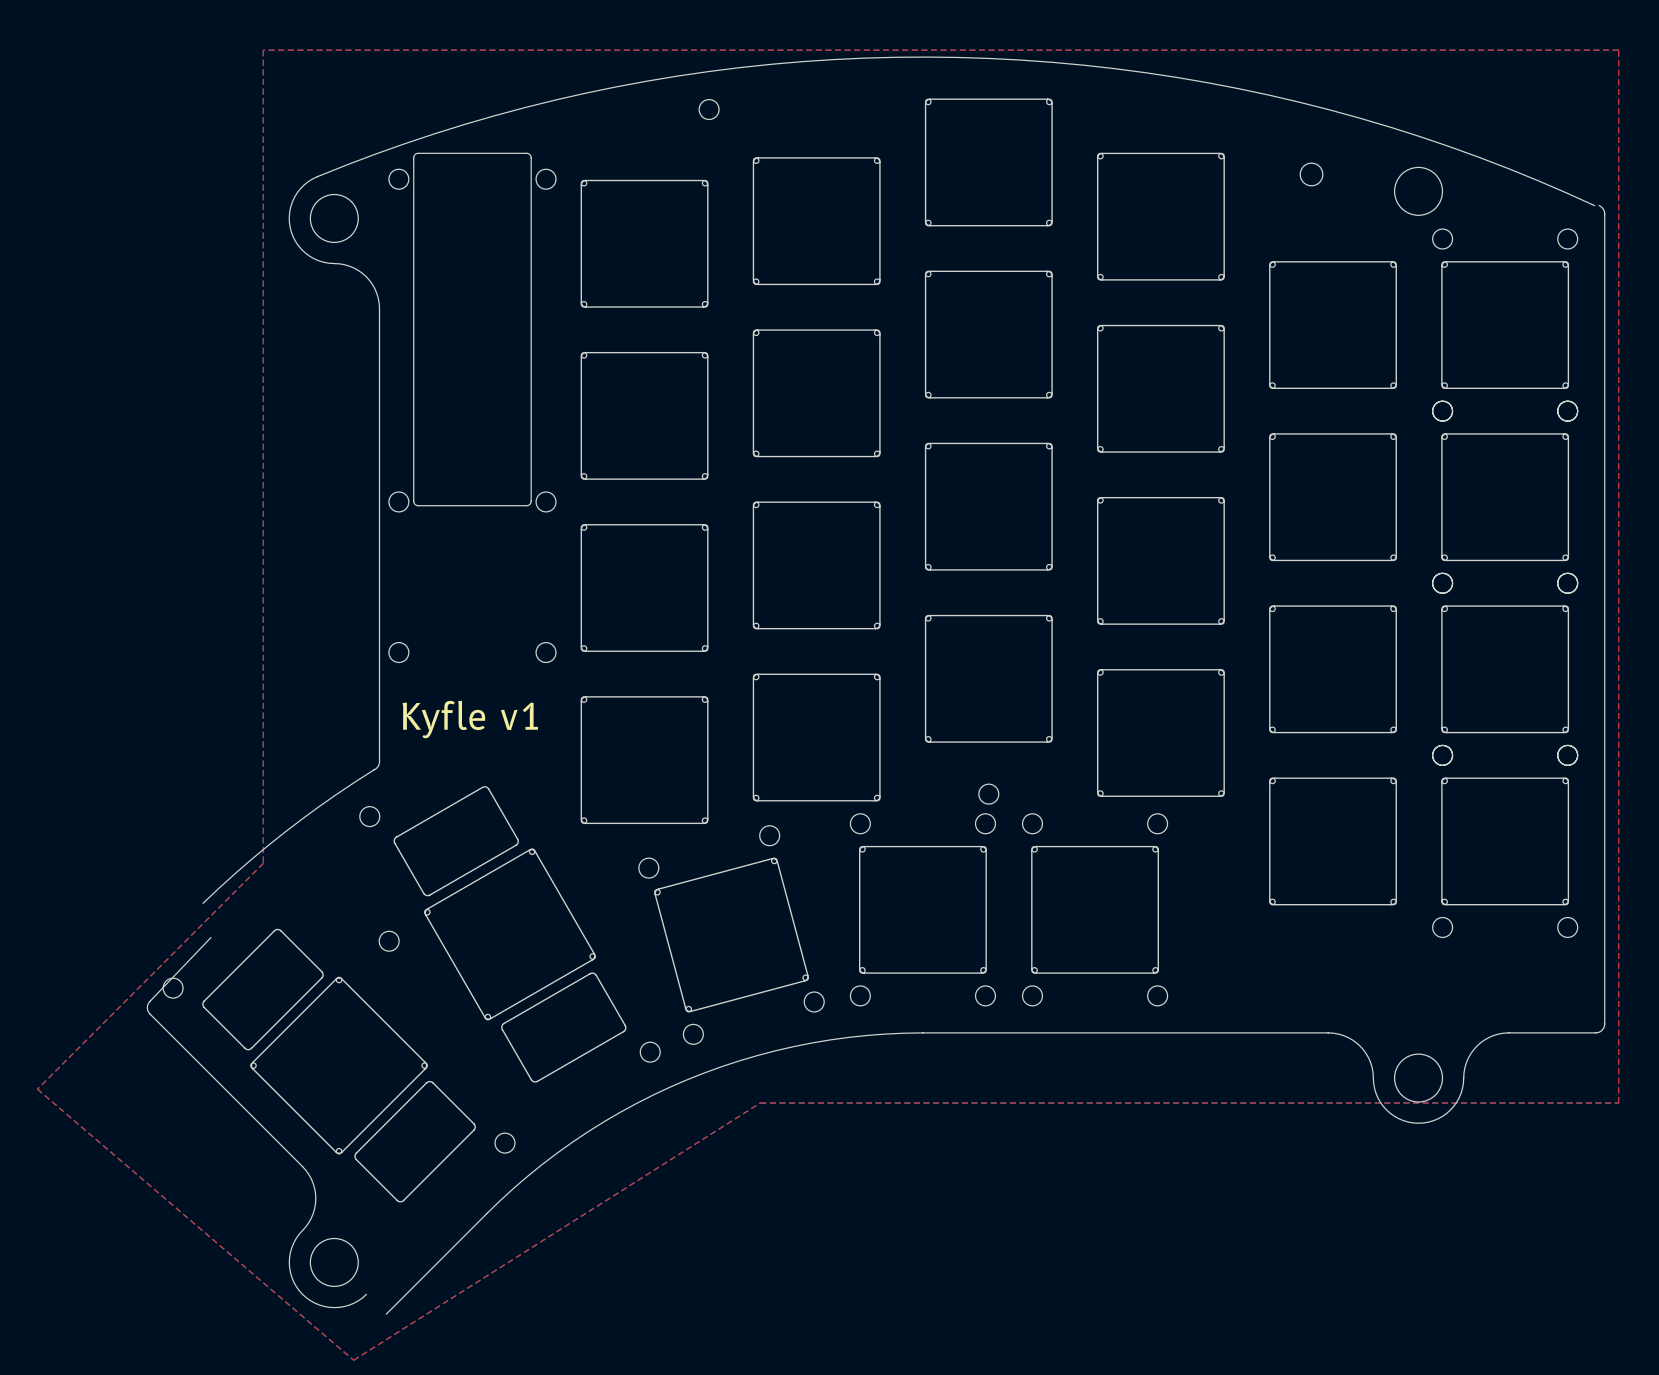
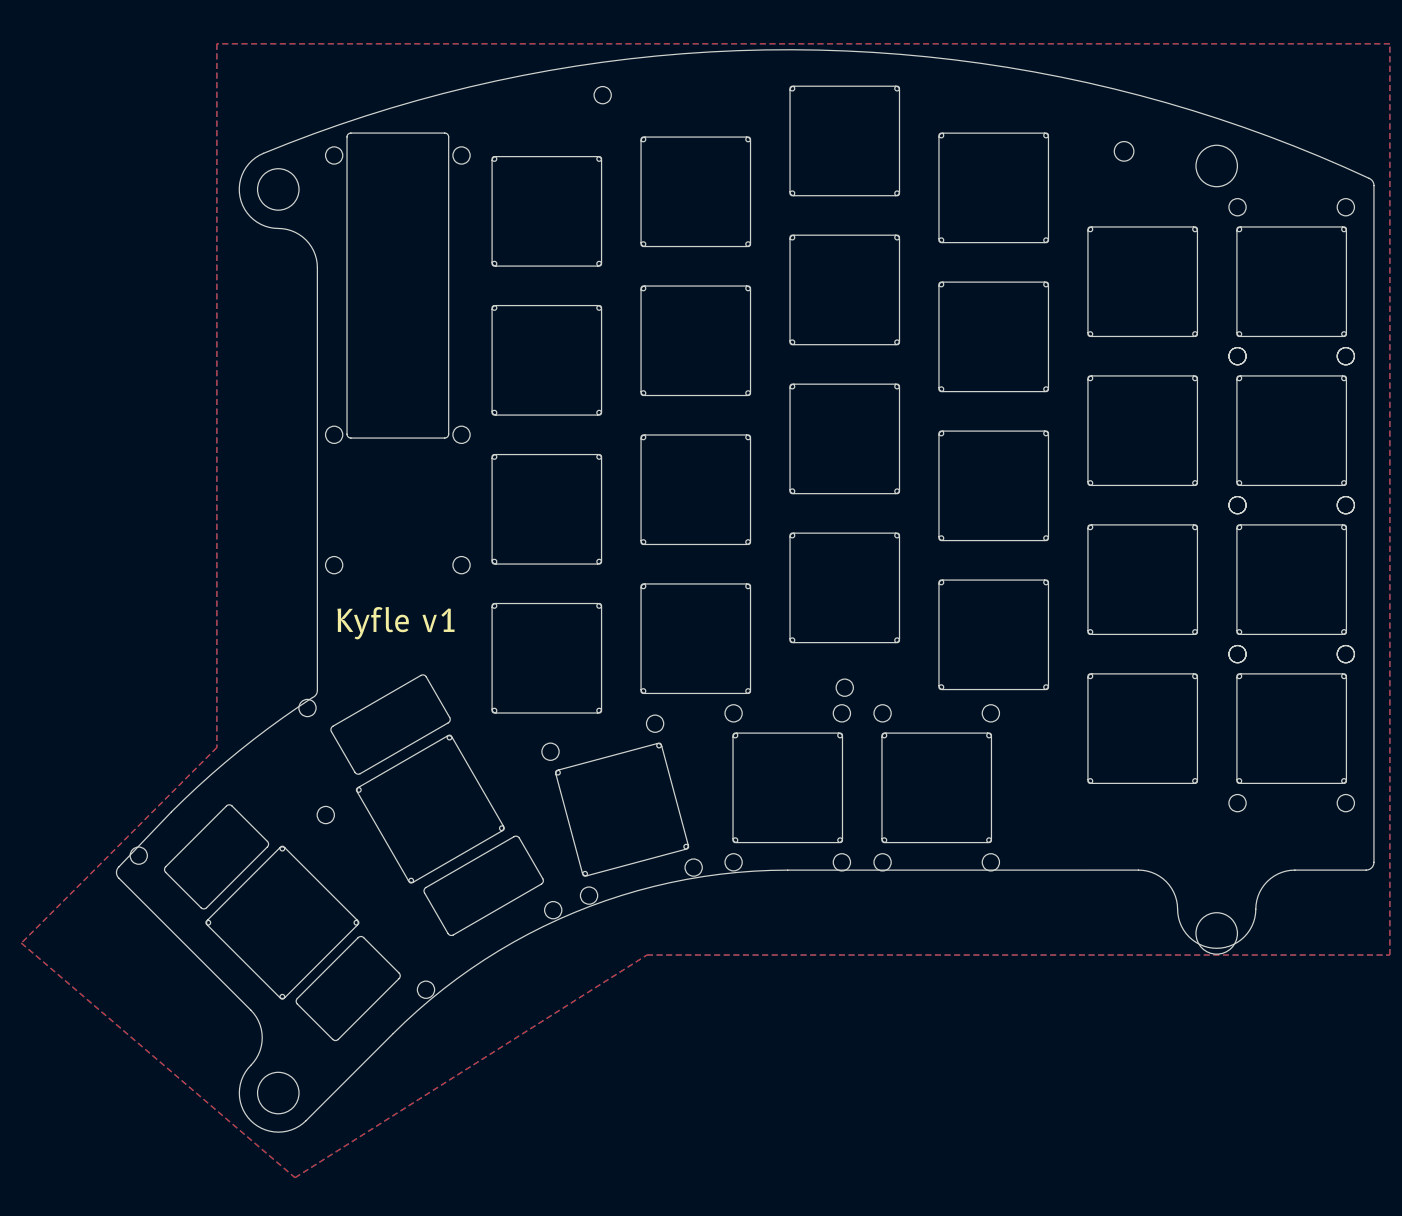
board edge: none -> (1369, 178) (1373, 185) (1373, 862) (1371, 867) (1366, 870) (1290, 870) (1277, 873) (1267, 881) (1259, 892) (1253, 922) (1247, 933) (1233, 944) (1216, 948) (1203, 946) (1189, 936) (1179, 922) (1176, 900) (1171, 888) (1159, 876) (1142, 870) (770, 870) (703, 876) (654, 886) (605, 900) (558, 919) (513, 942) (470, 968) (443, 988) (405, 1021) (306, 1120)
board edge: (1599, 205) (1603, 208) (1604, 214) (1604, 1023) (1602, 1030) (1595, 1032) (1503, 1033) (1489, 1037) (1476, 1046) (1468, 1058) (1461, 1092) (1453, 1106) (1438, 1118) (1418, 1123) (1403, 1120) (1386, 1110) (1375, 1092) (1372, 1068) (1366, 1054) (1352, 1039) (1333, 1033) (904, 1033) (830, 1039) (775, 1050) (721, 1066) (669, 1087) (620, 1112) (572, 1142) (528, 1175) (500, 1200) (386, 1314) -> none
board edge: (379, 761) (375, 768) (319, 806) (267, 845) (202, 903) -> (317, 659) (317, 690) (315, 695) (239, 751) (171, 811)
part footprint: [359, 786, 661, 1083] -> [298, 674, 562, 937]

